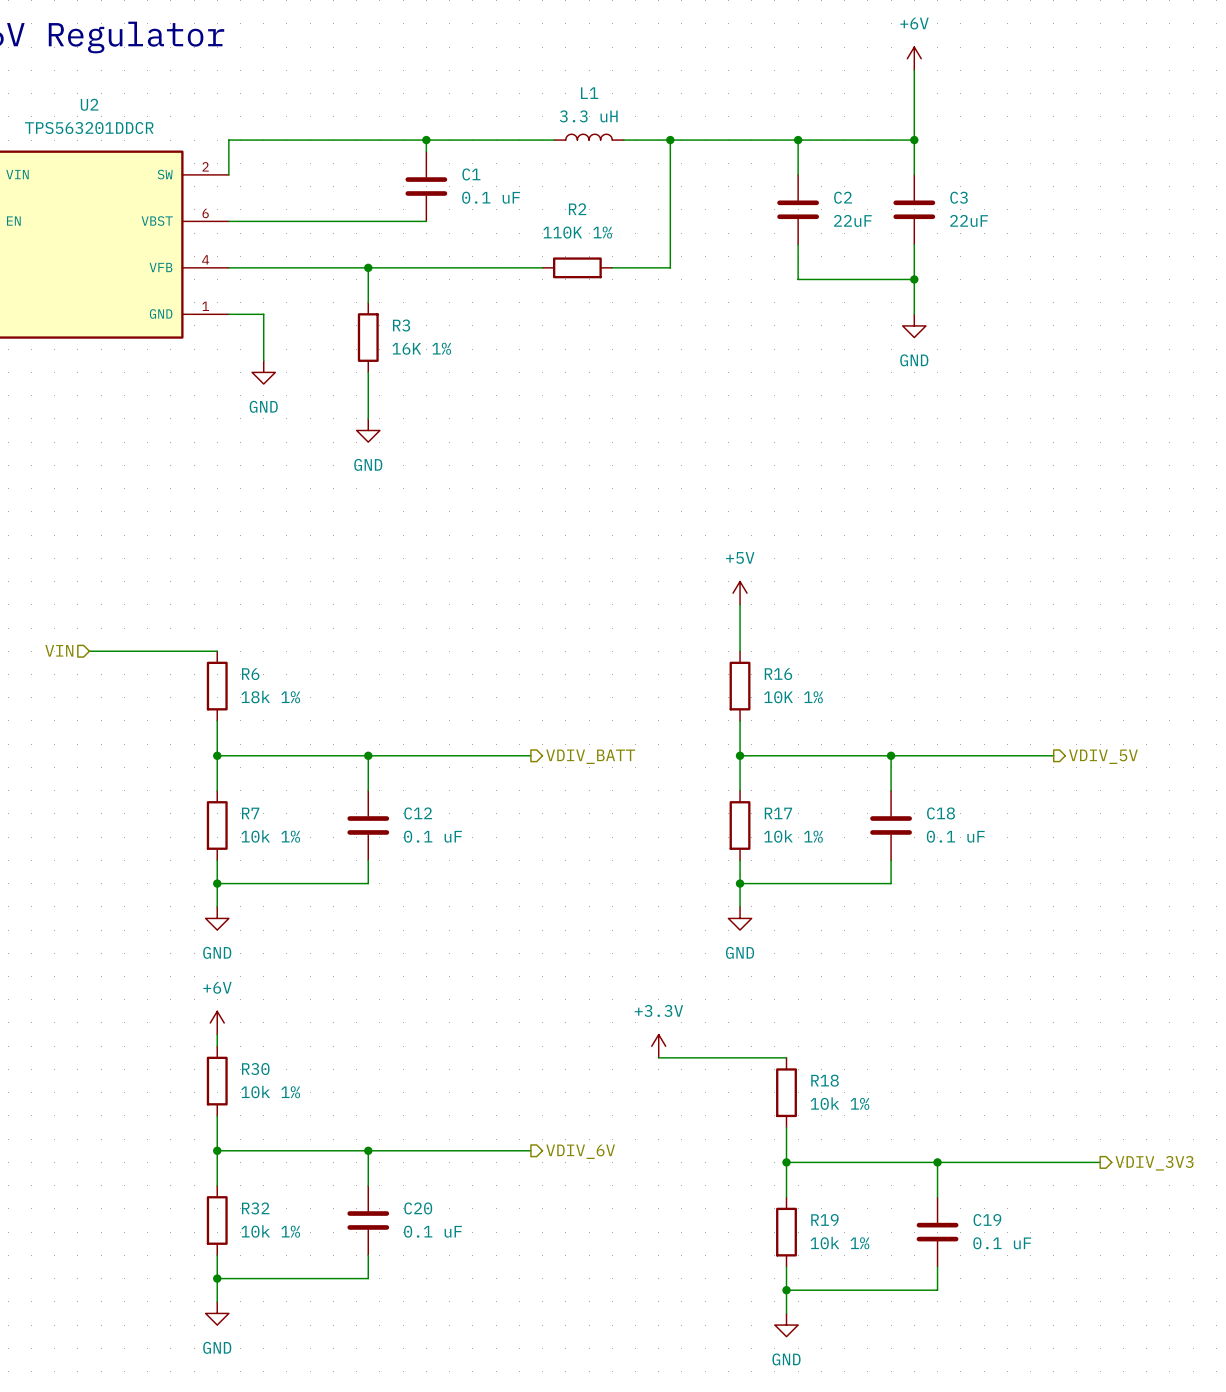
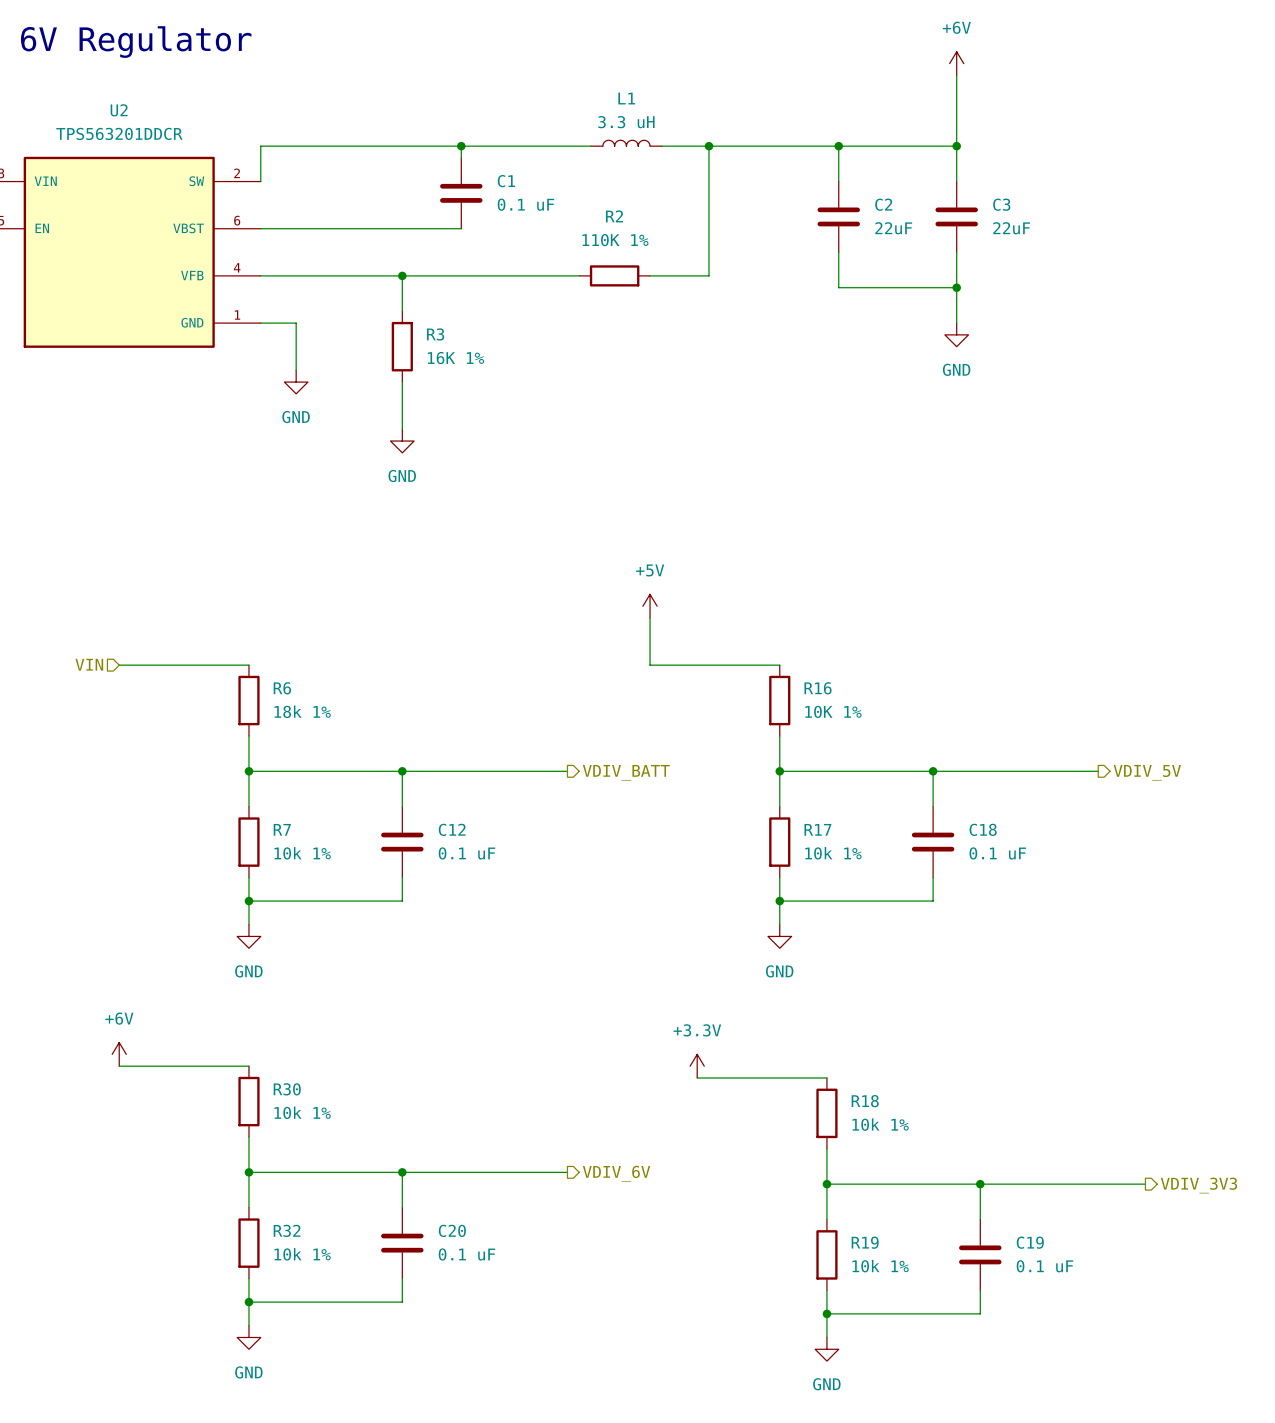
power symbol position: +5V (740, 593) -> +5V (650, 606)
wire: (740, 604) (740, 651) -> (650, 617) (650, 665) (779, 665)
power symbol position: +6V (217, 1022) -> +6V (119, 1054)
wire: (217, 1034) (217, 1046) -> (119, 1066) (248, 1066)

